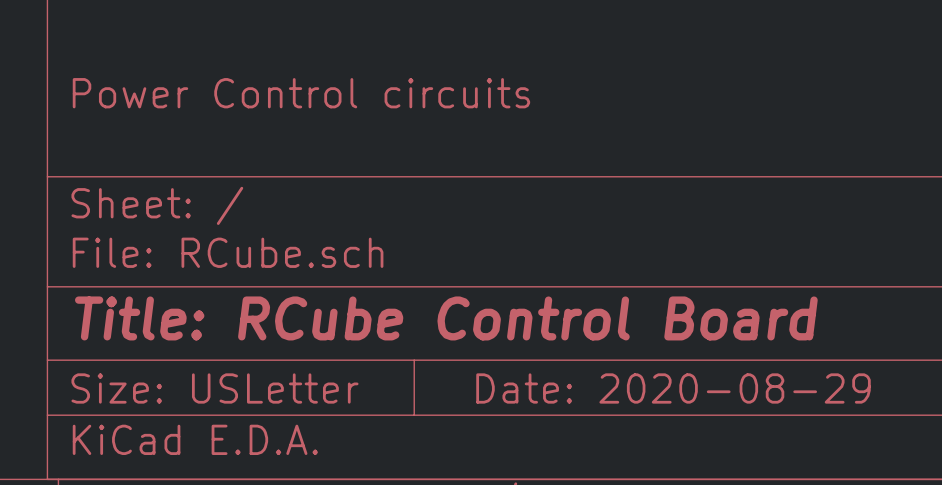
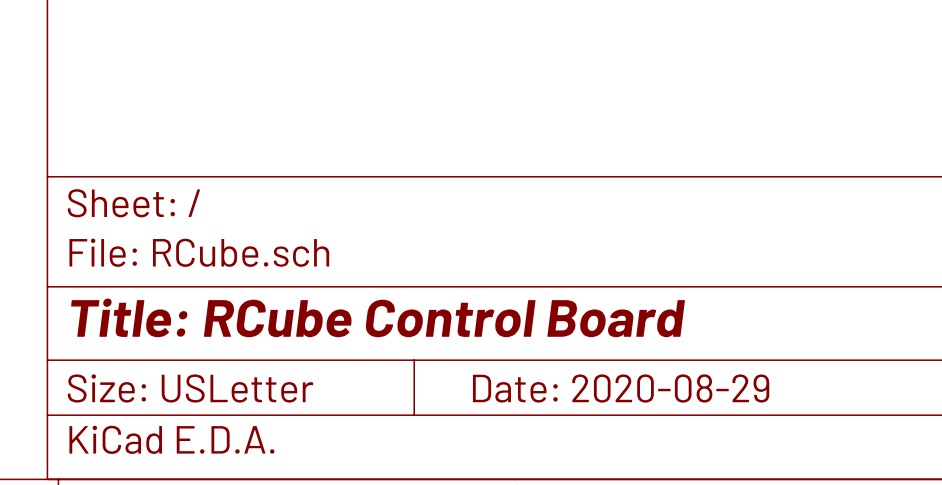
title block: Power Control circuits (301, 93) -> none

